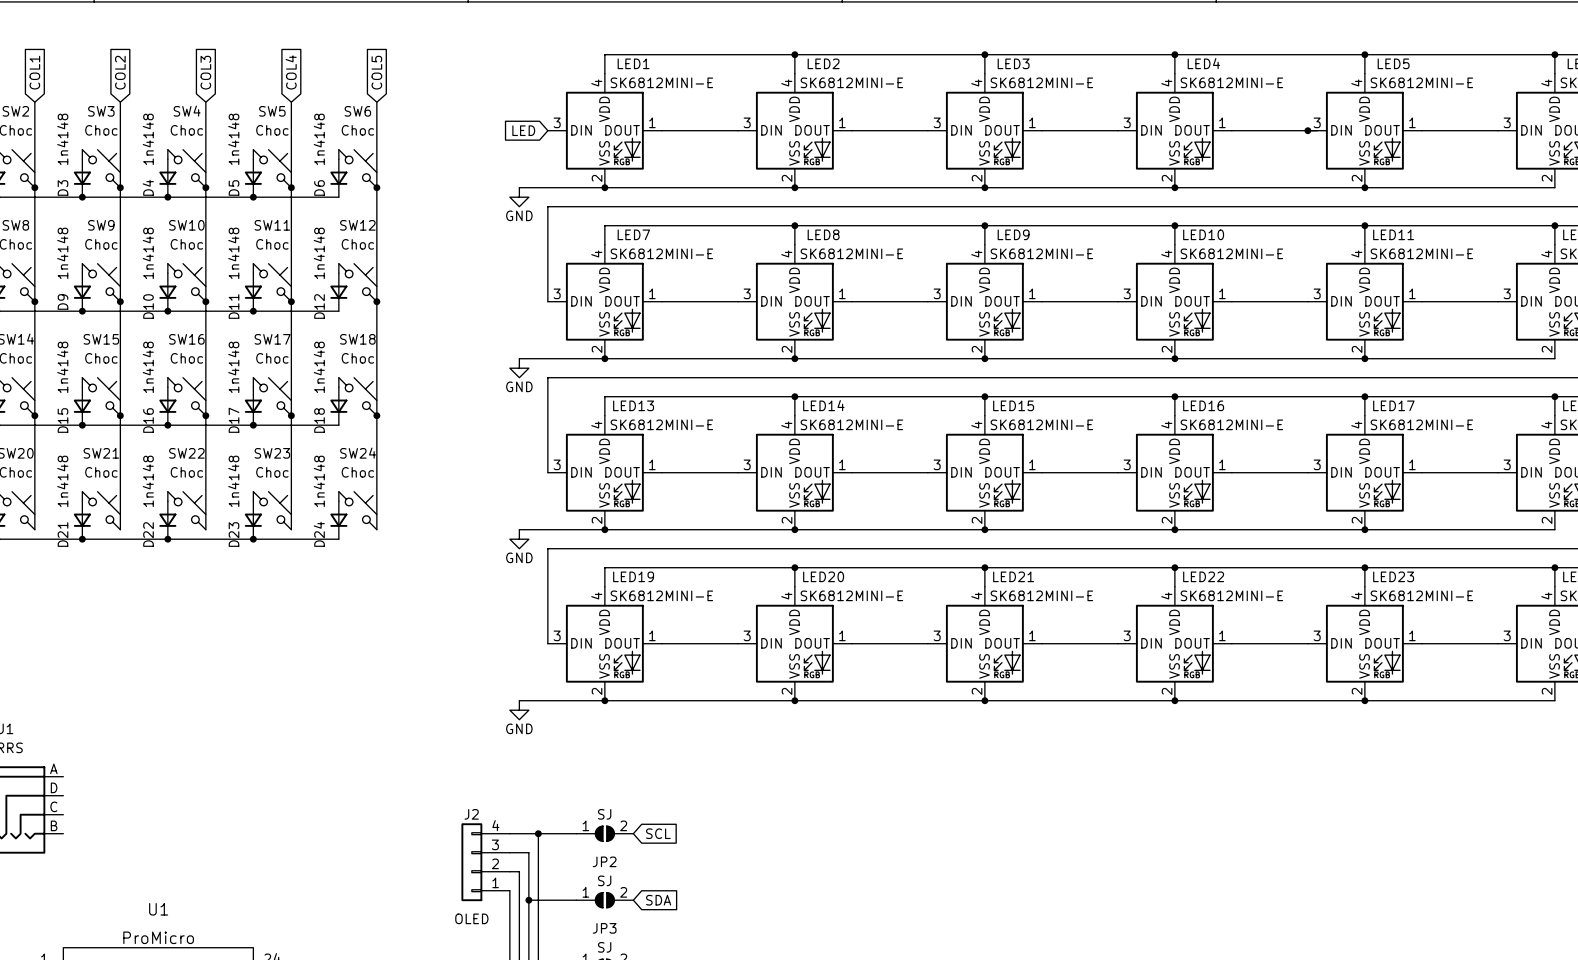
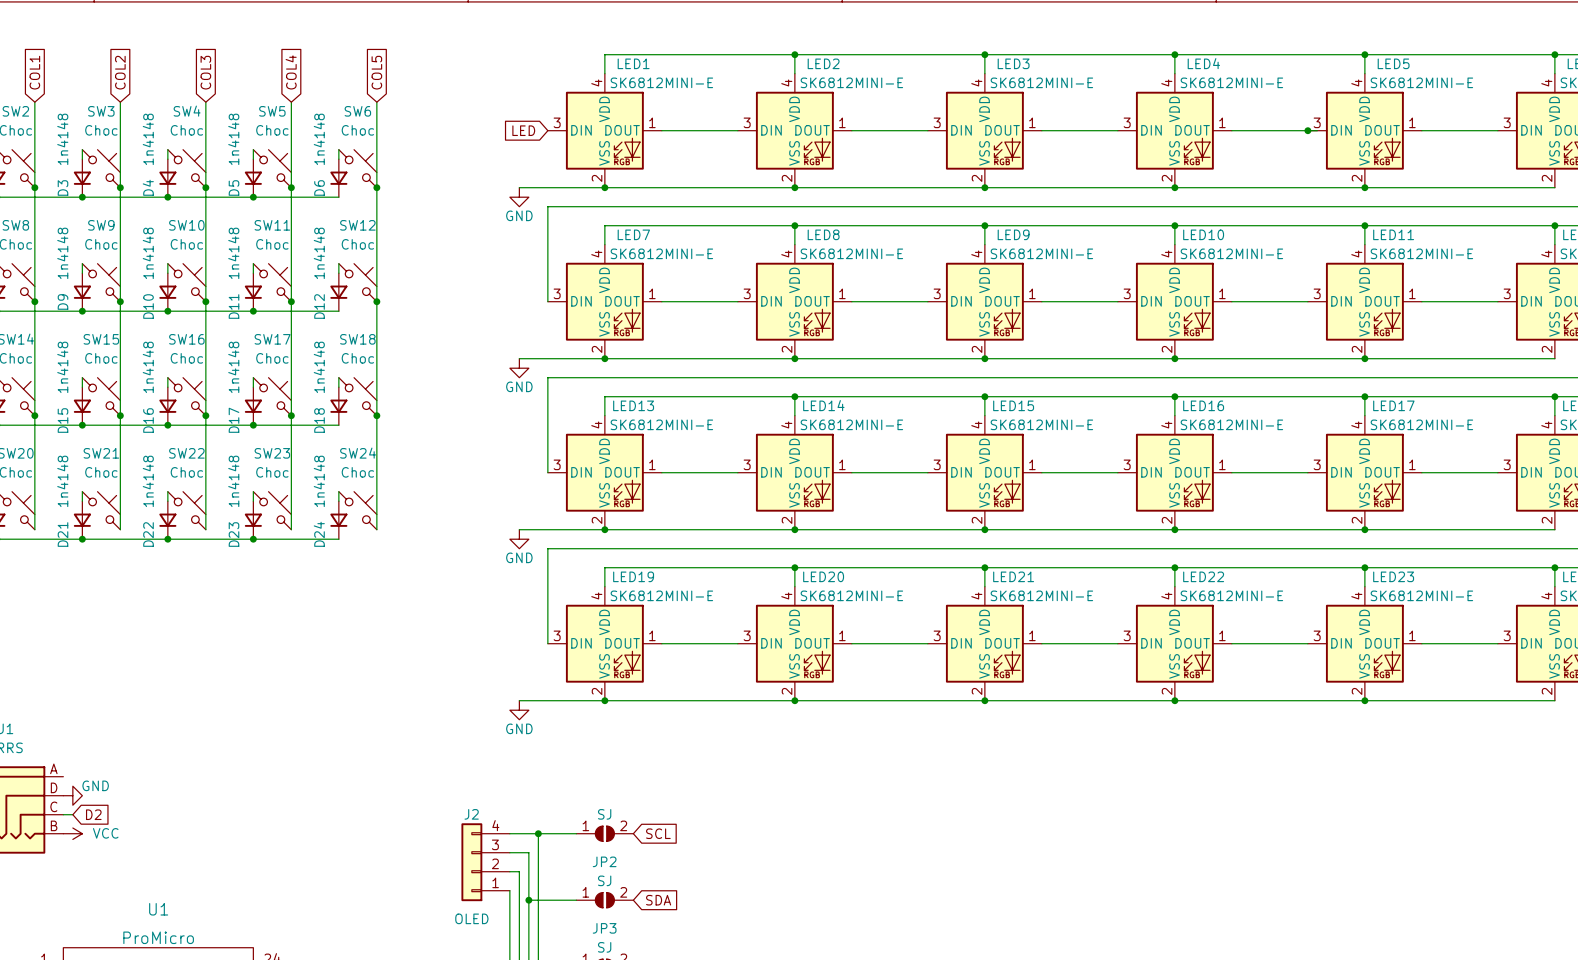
power symbol: none -> GND (72, 795)
wire: none -> (63, 814) (72, 814)
global label: none -> D2 (93, 814)
power symbol: none -> VCC (72, 833)

